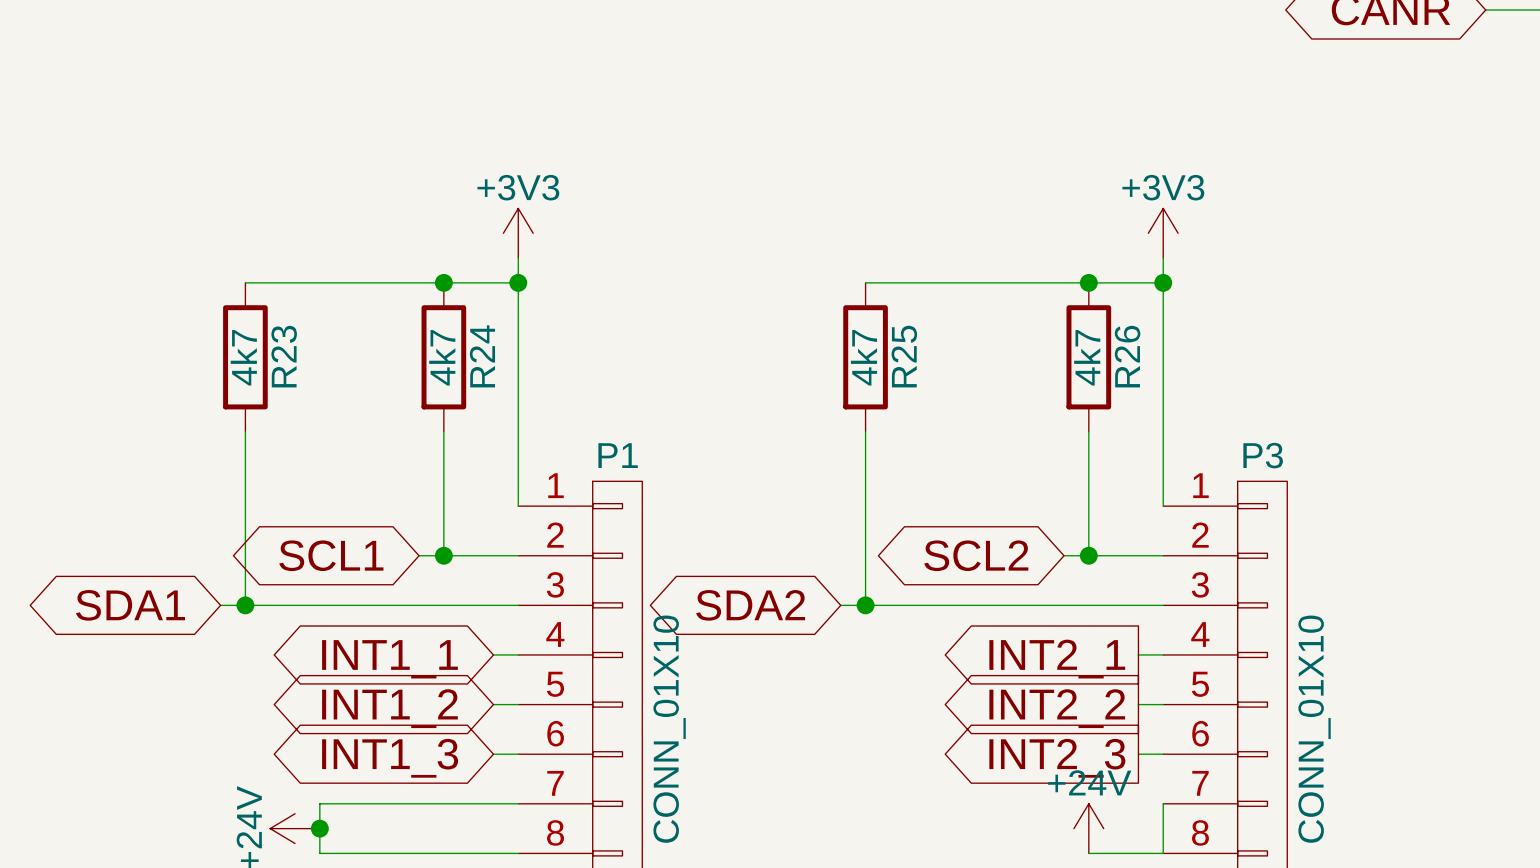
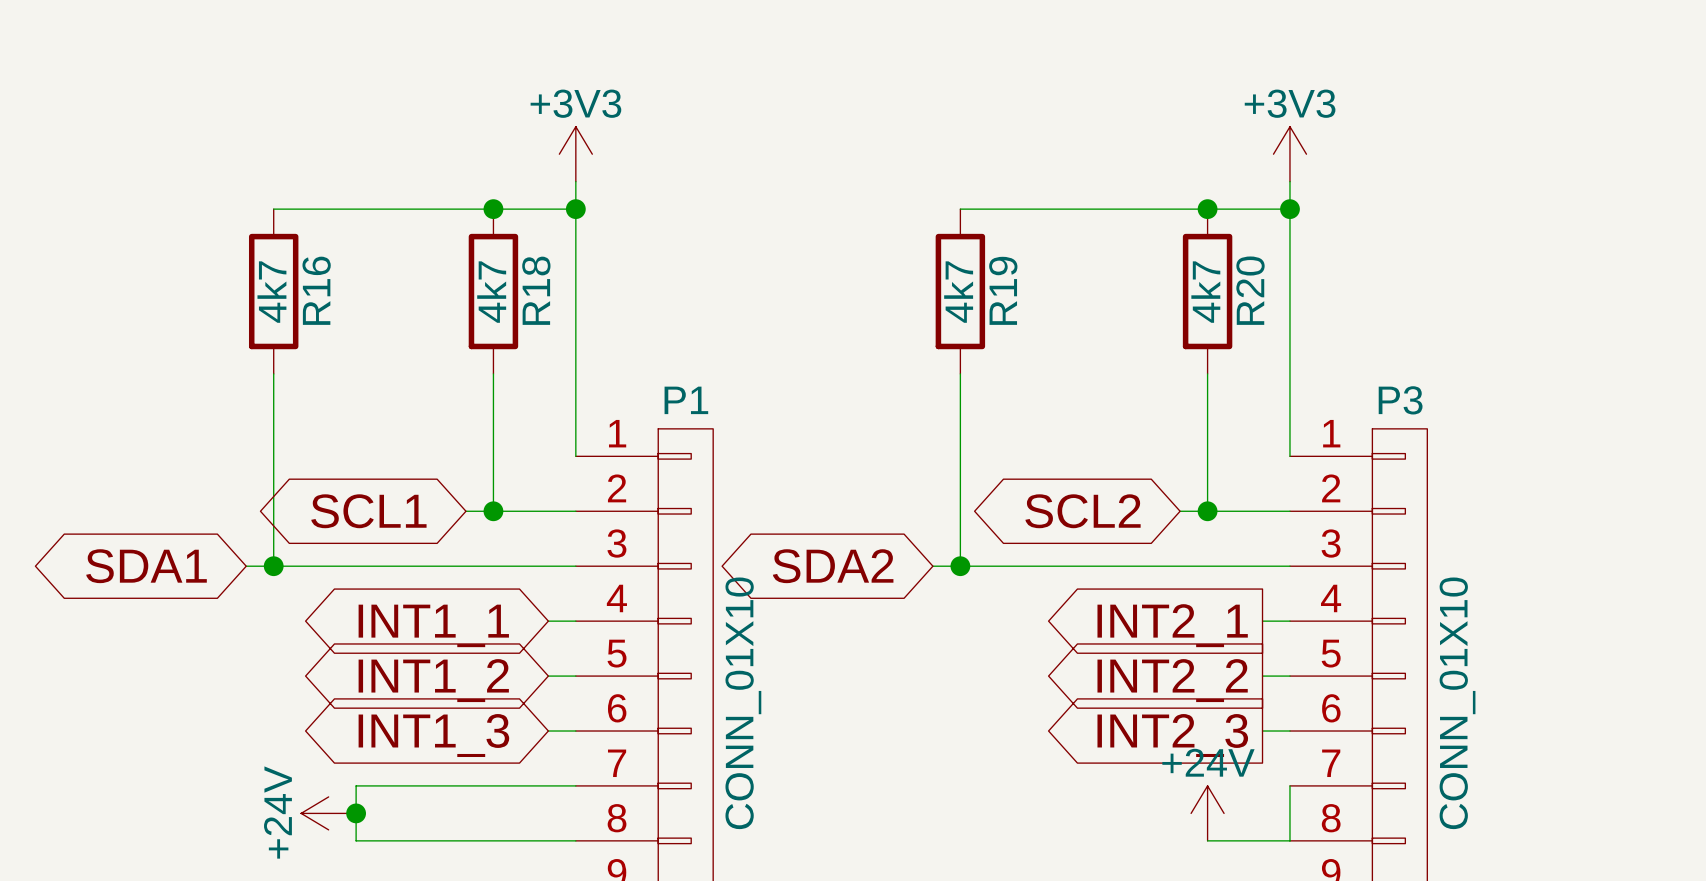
R23 name: R23 (284, 356) -> R16 (316, 290)
R24 name: R24 (482, 356) -> R18 (536, 290)
R25 name: R25 (904, 356) -> R19 (1003, 290)
R26 name: R26 (1127, 356) -> R20 (1250, 290)

